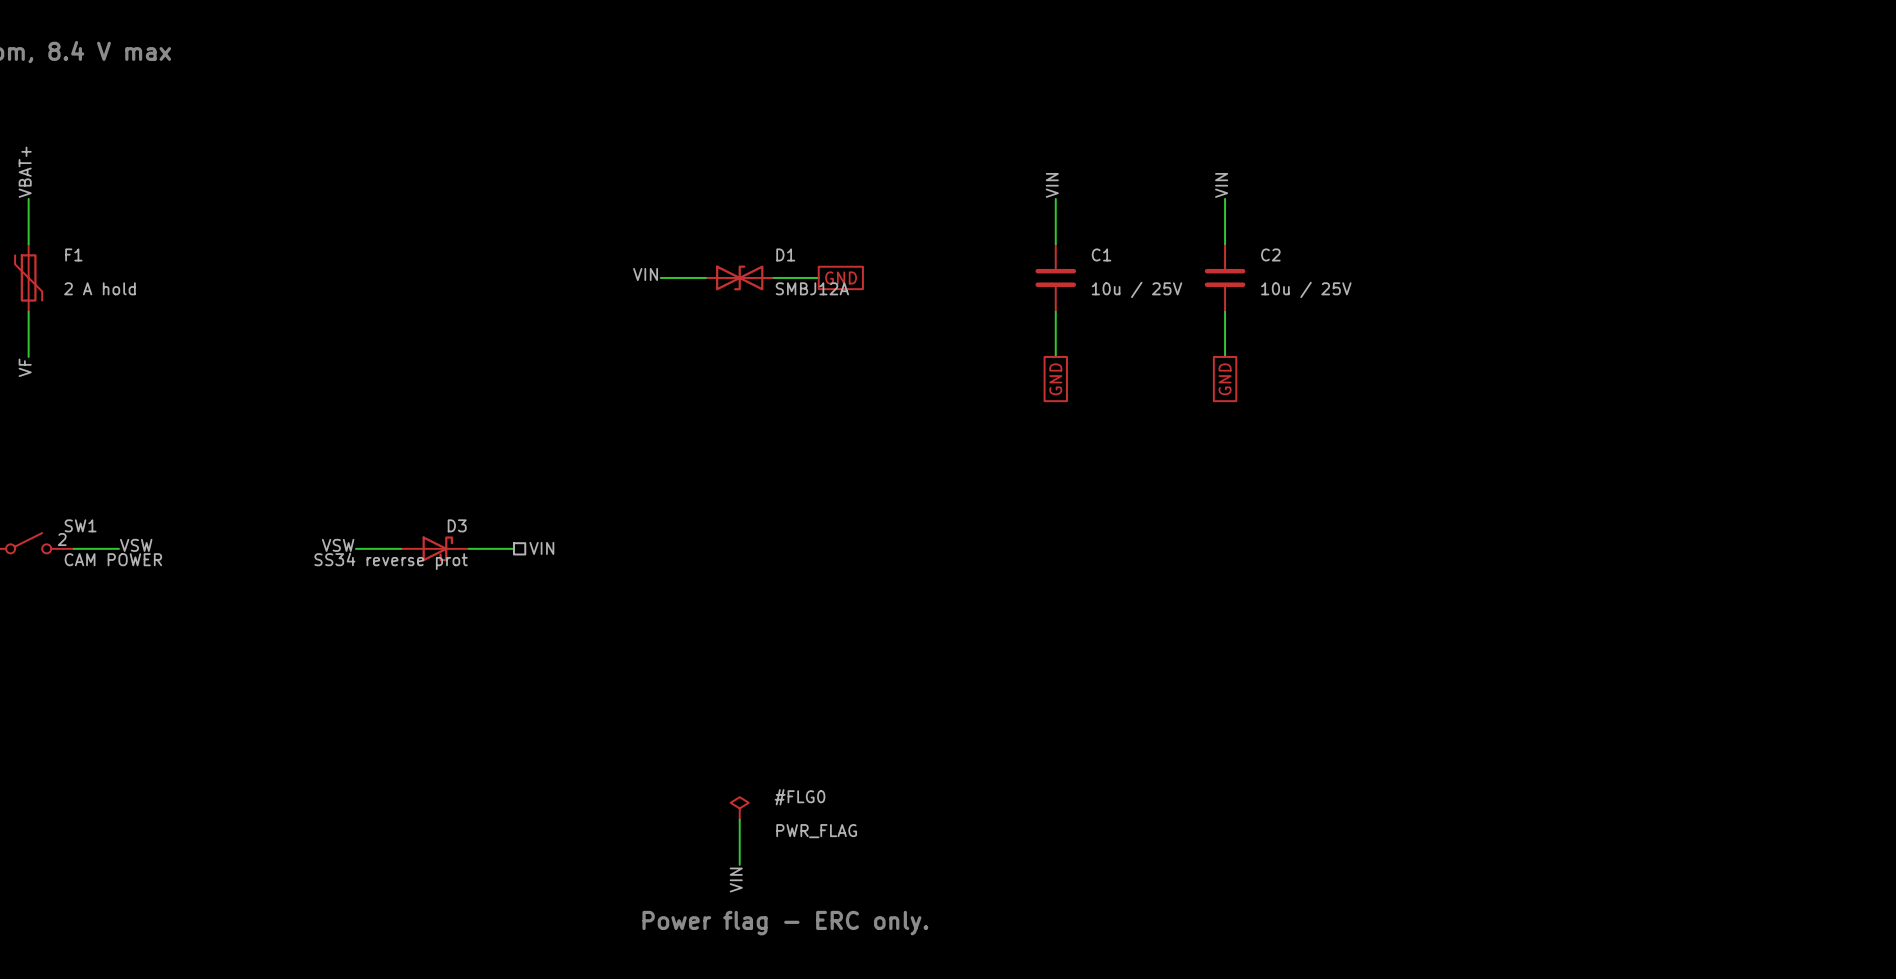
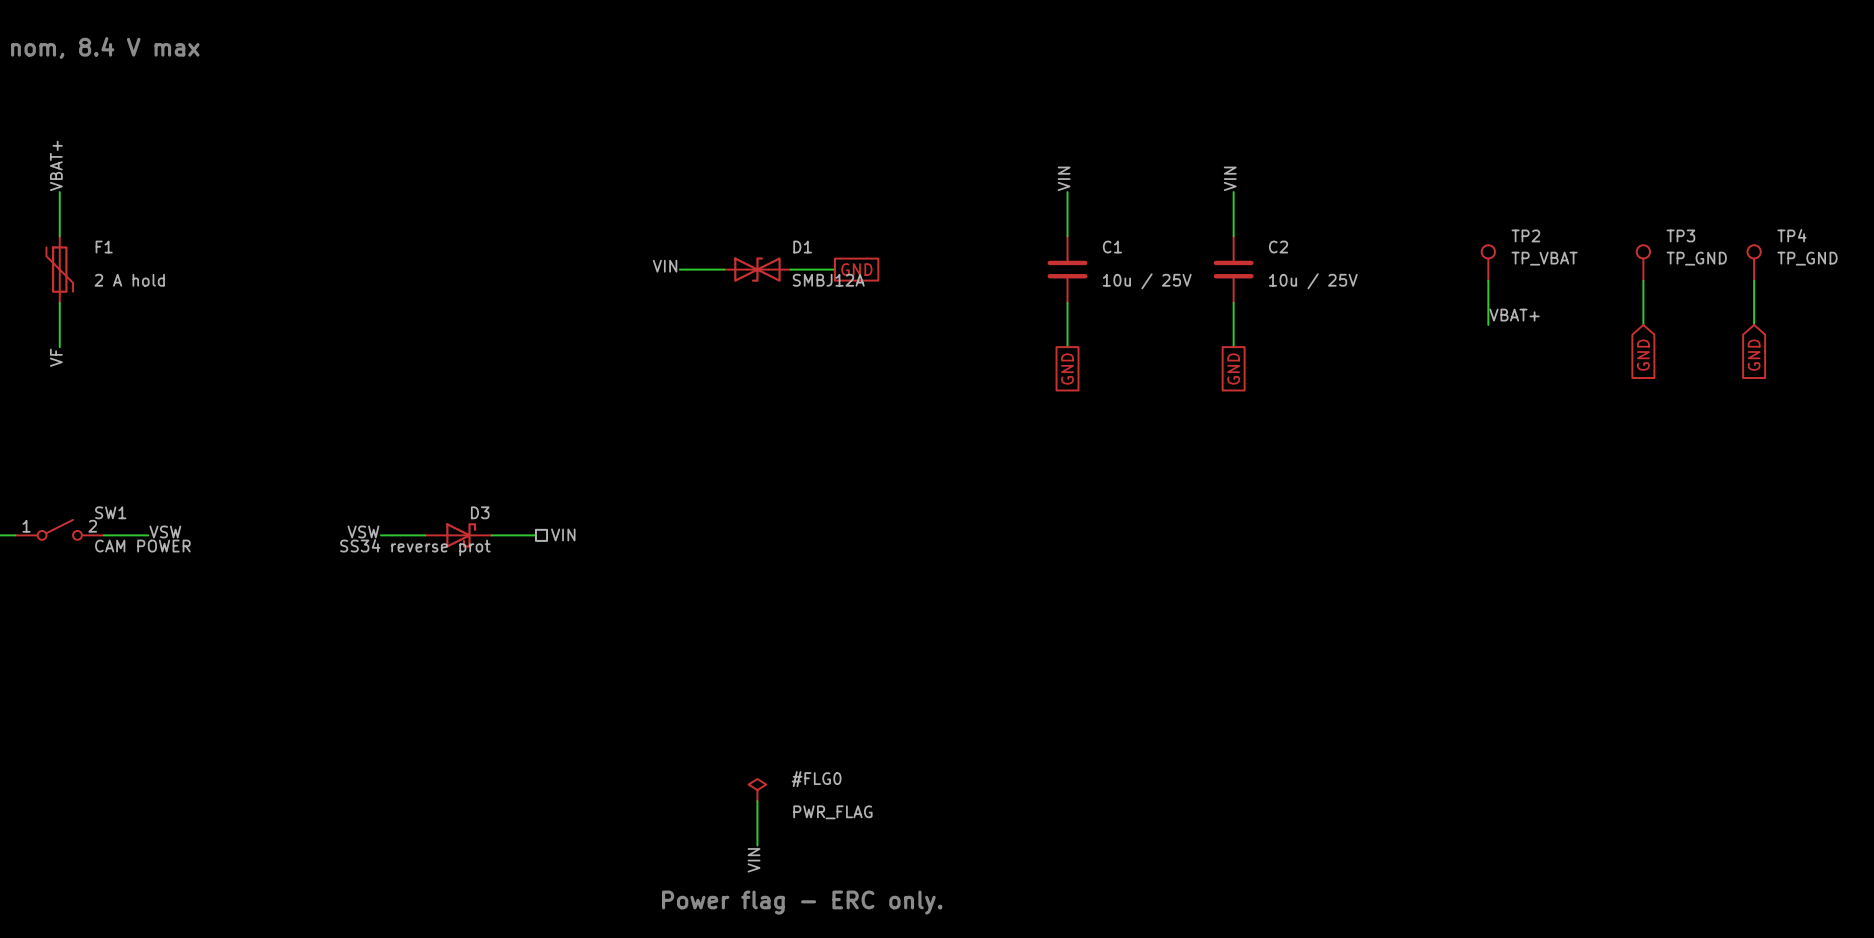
TP2: none -> TP_VBAT (1488, 262)
TP3: none -> TP_GND (1643, 262)
TP4: none -> TP_GND (1754, 262)
wire: none -> (1488, 280) (1488, 324)
wire: none -> (1643, 280) (1643, 324)
wire: none -> (1754, 280) (1754, 324)
label: none -> VBAT+ (1514, 315)
global label: none -> GND (1643, 355)
global label: none -> GND (1754, 355)

